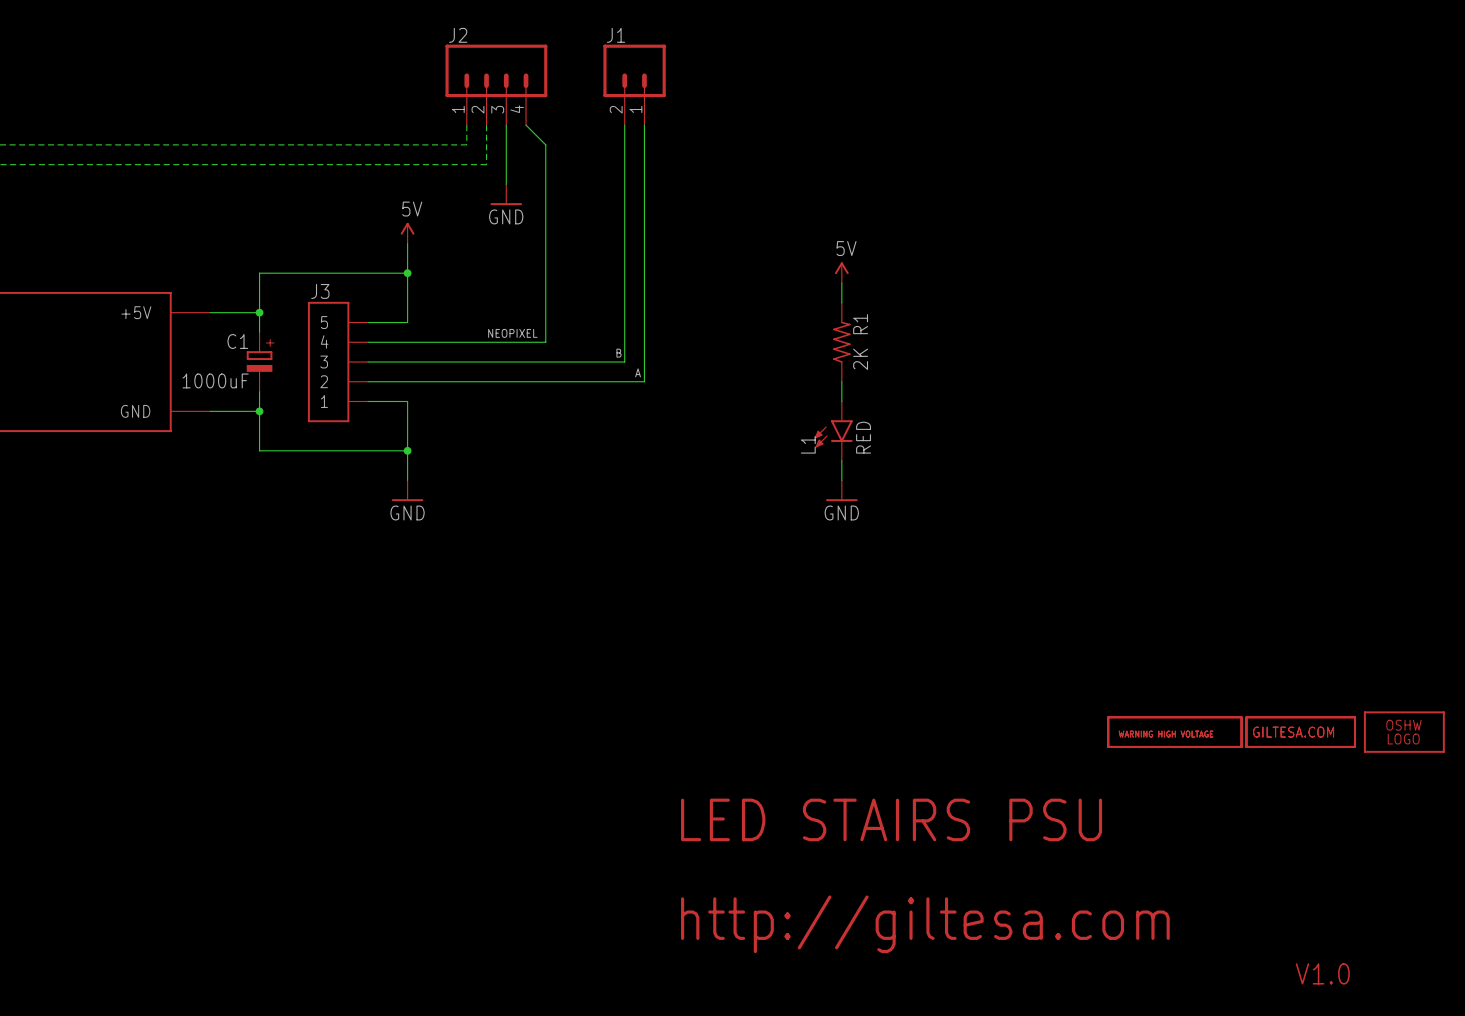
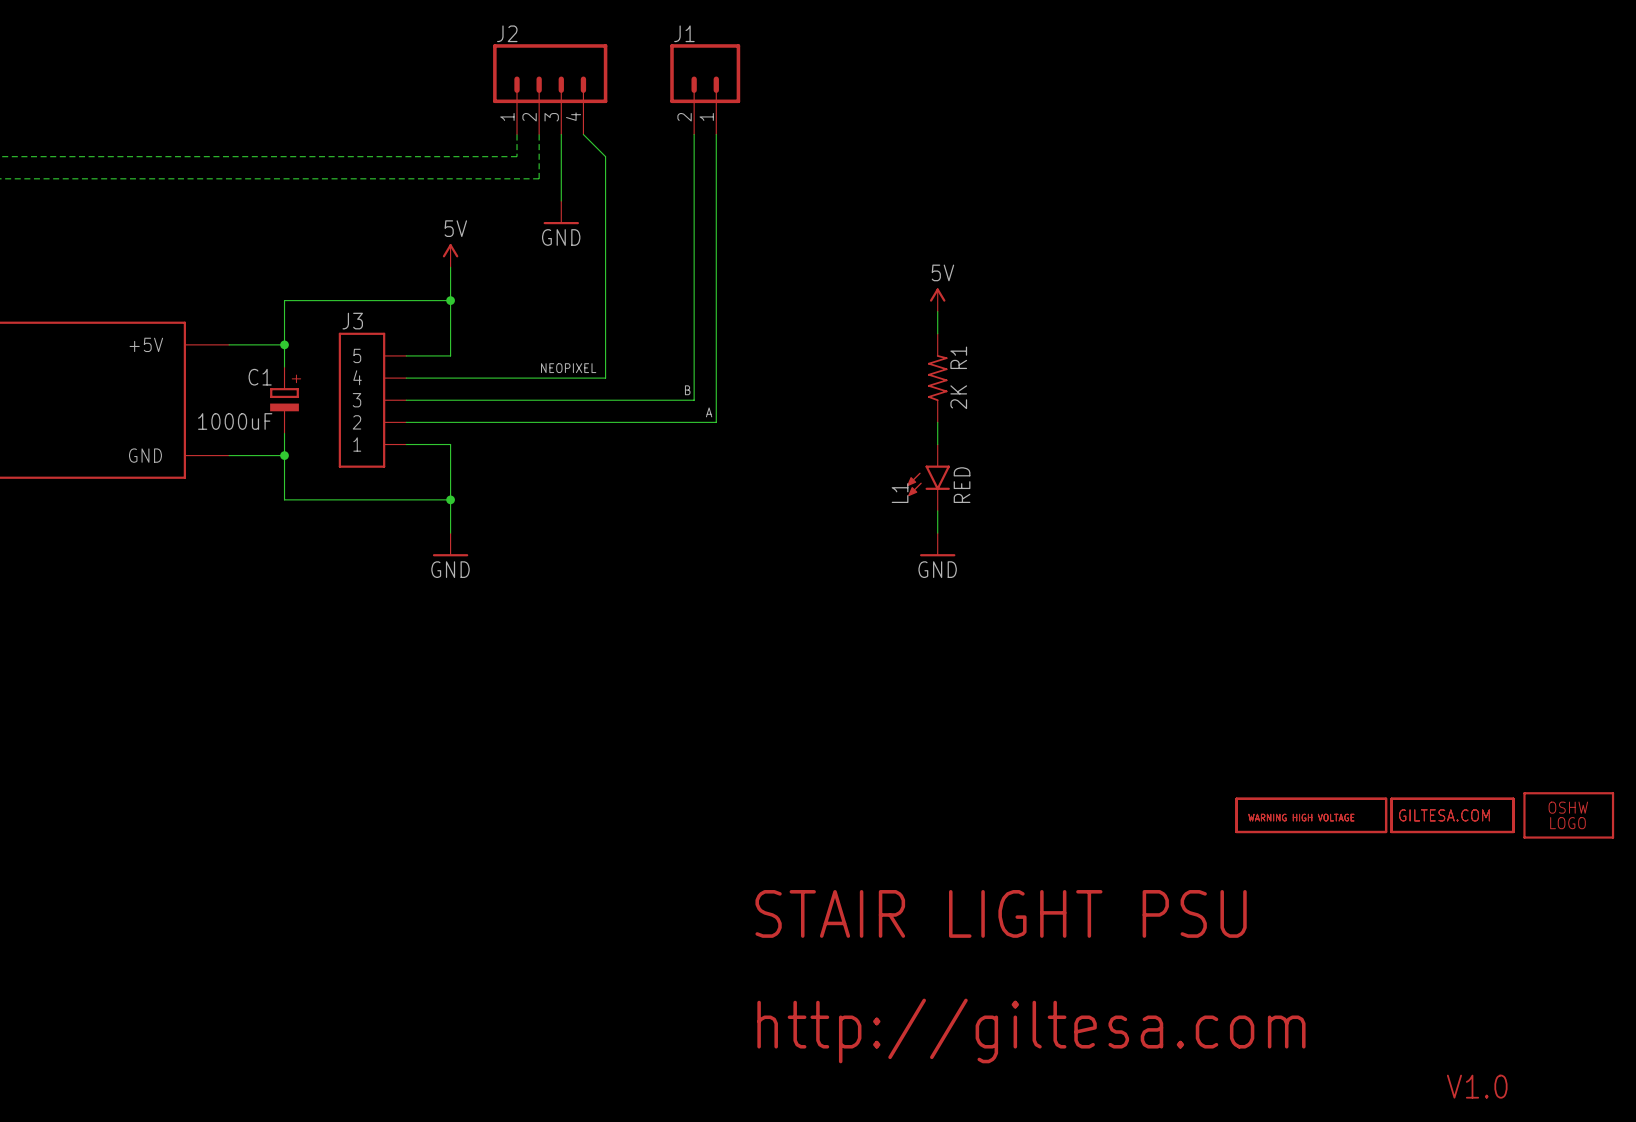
text: LED STAIRS PSU (891, 819) -> STAIR LIGHT PSU (1001, 913)

